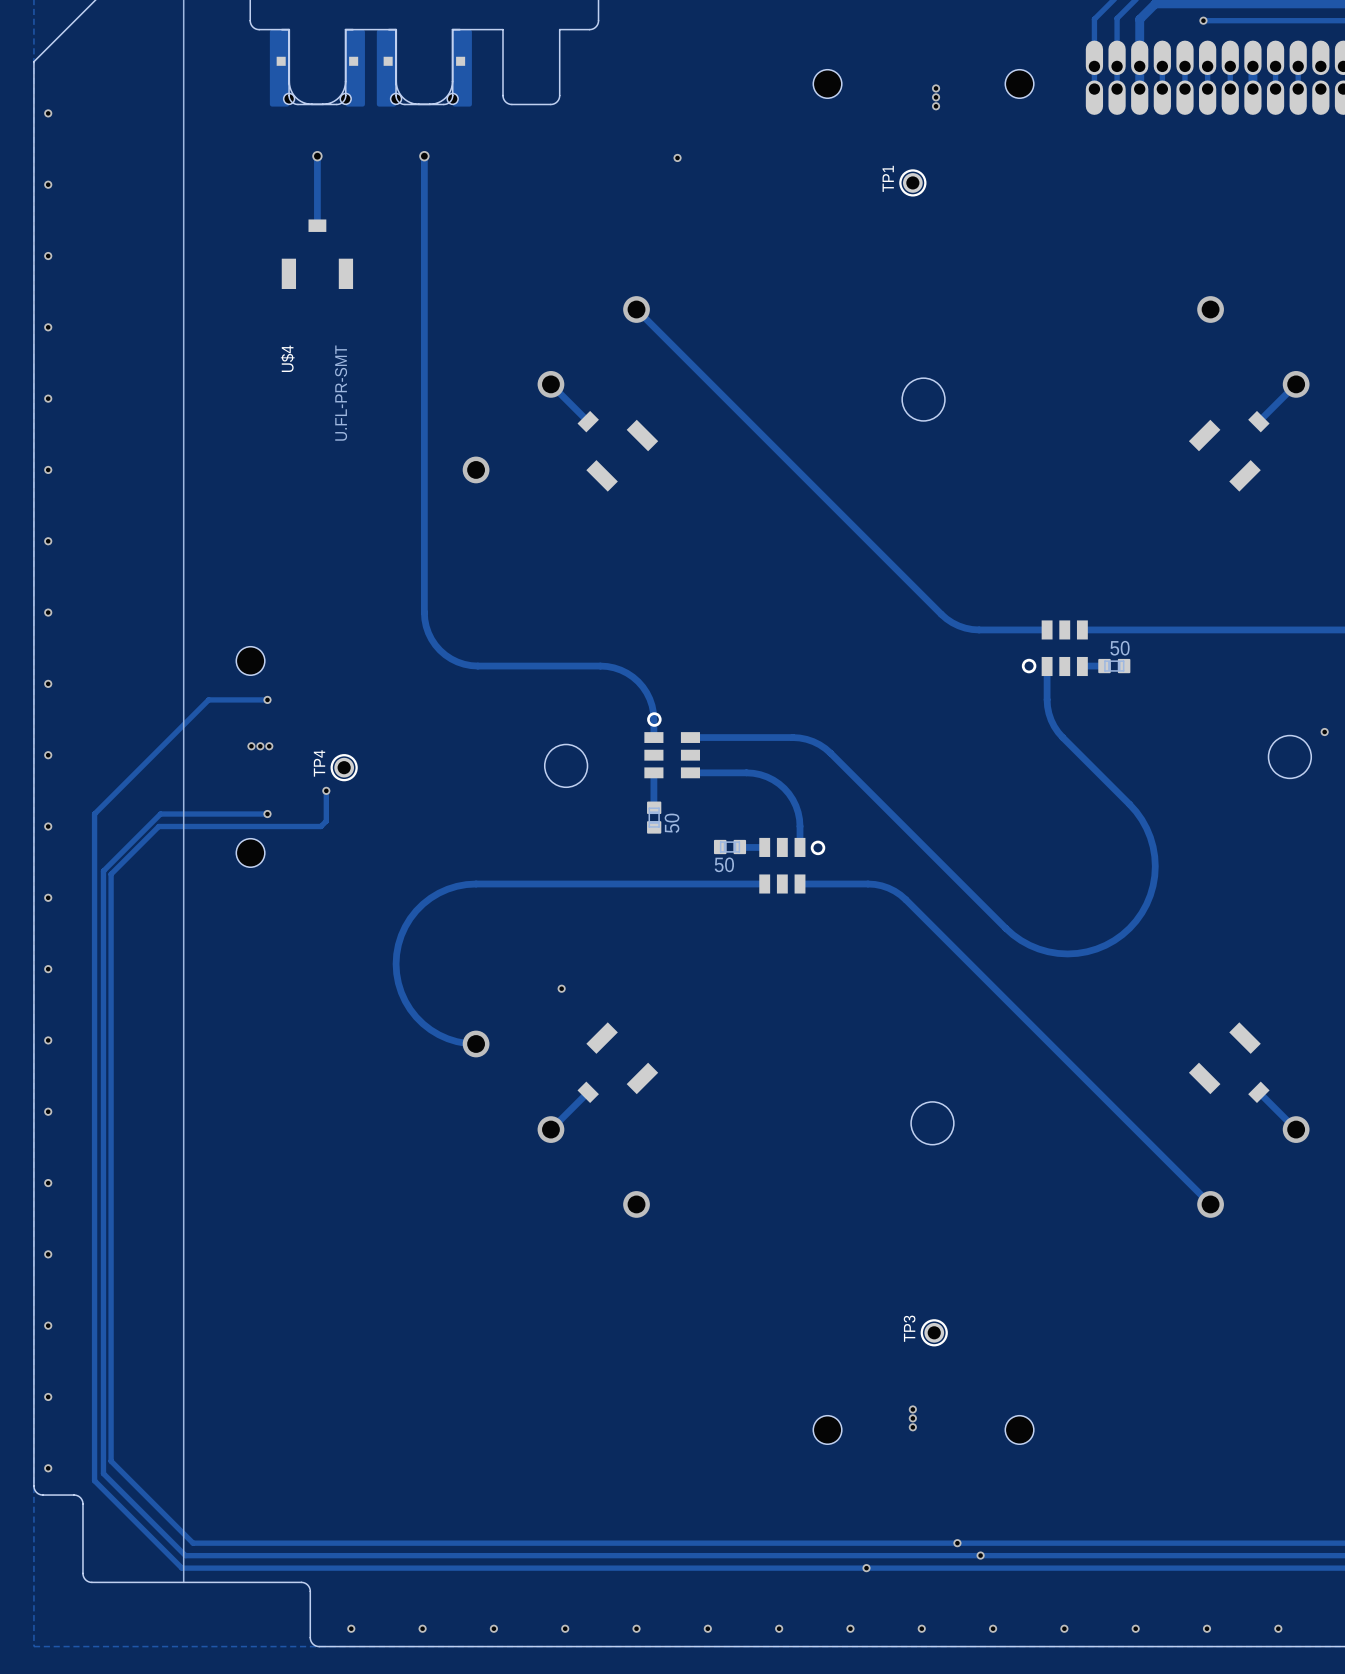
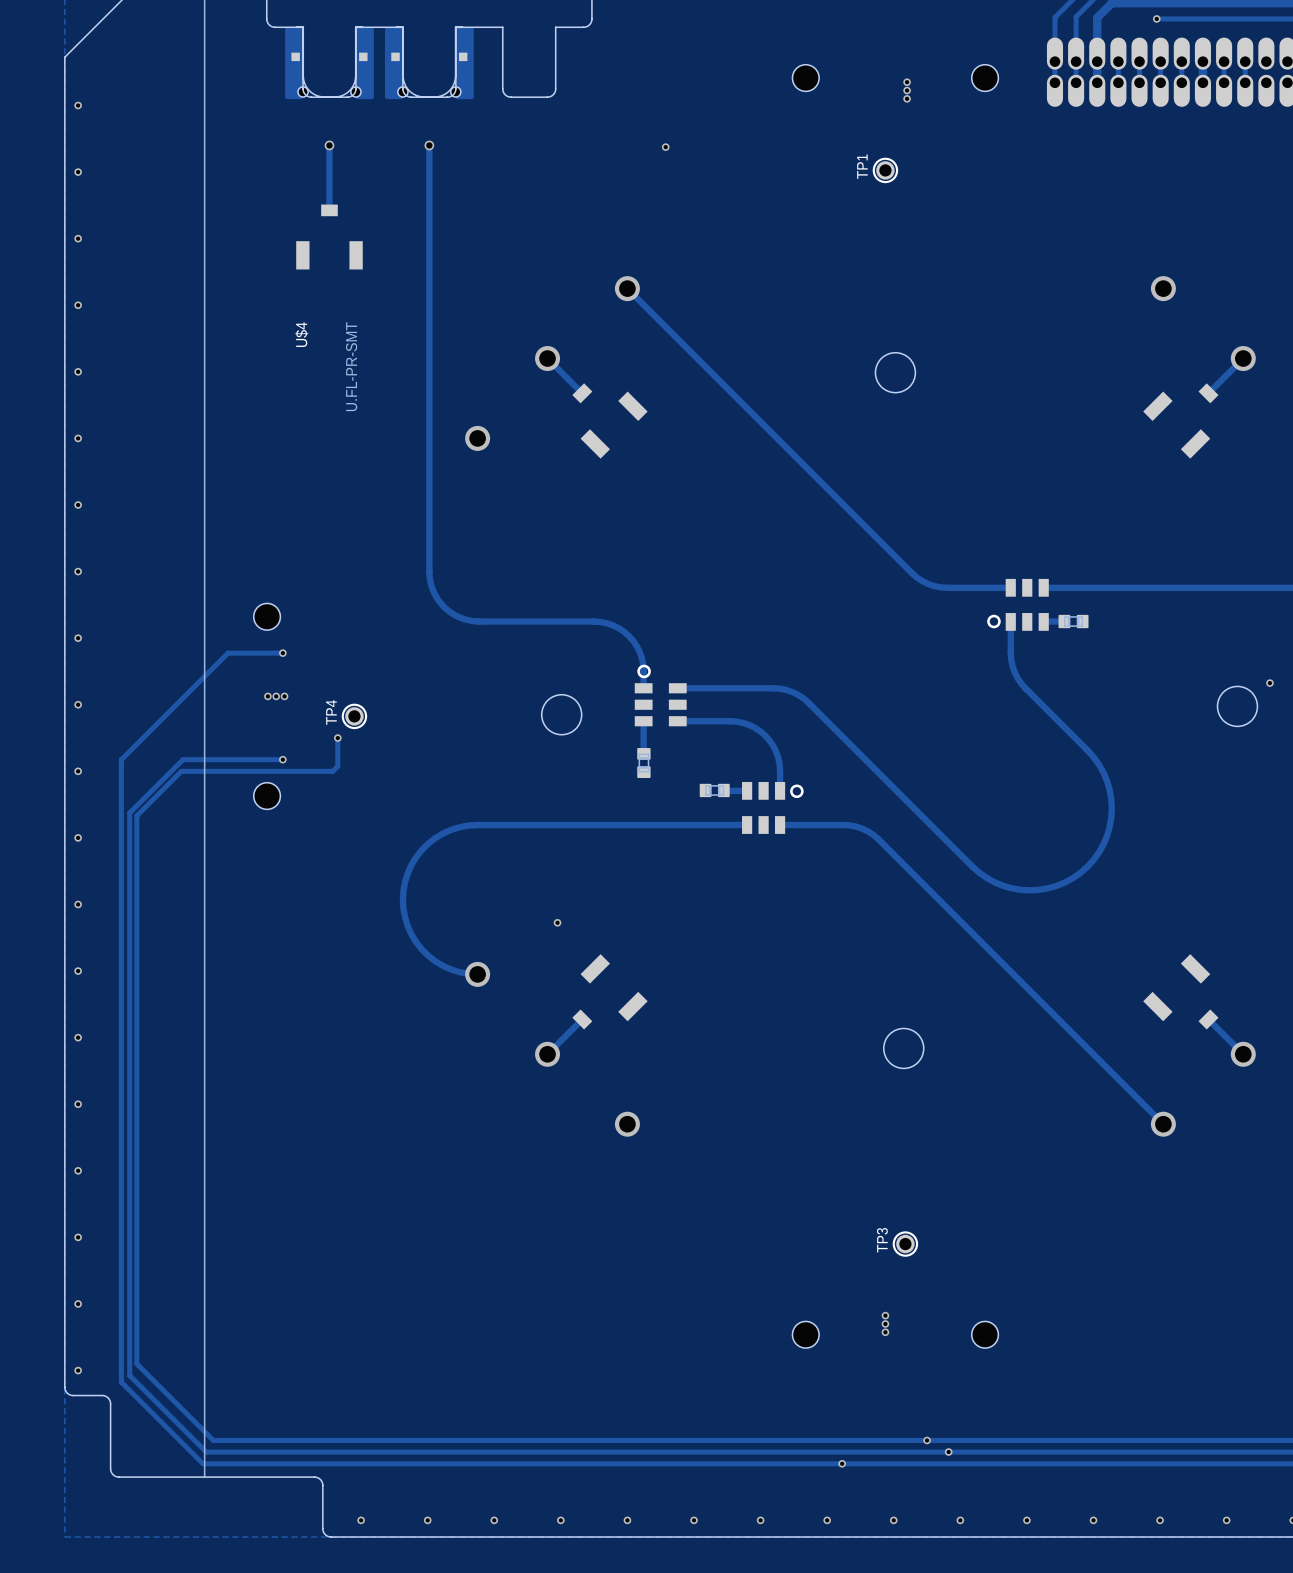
part value: 50 (1119, 648) -> none
part value: 50 (672, 823) -> none
part value: 50 (724, 864) -> none

